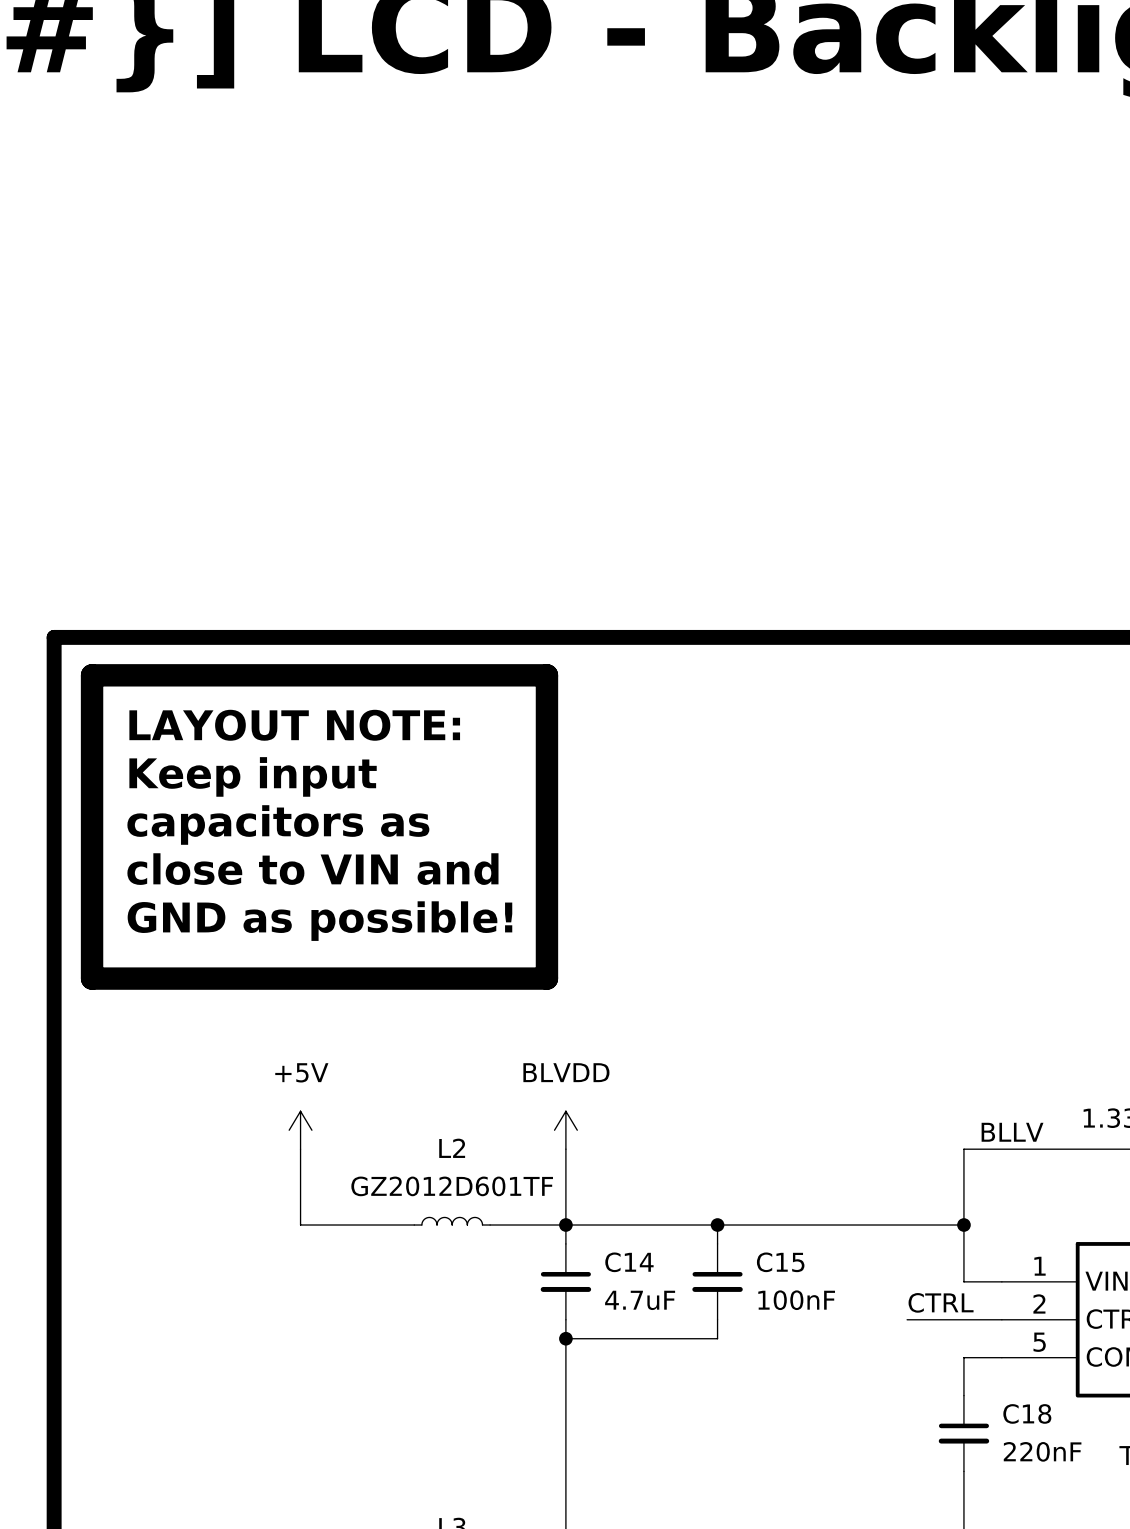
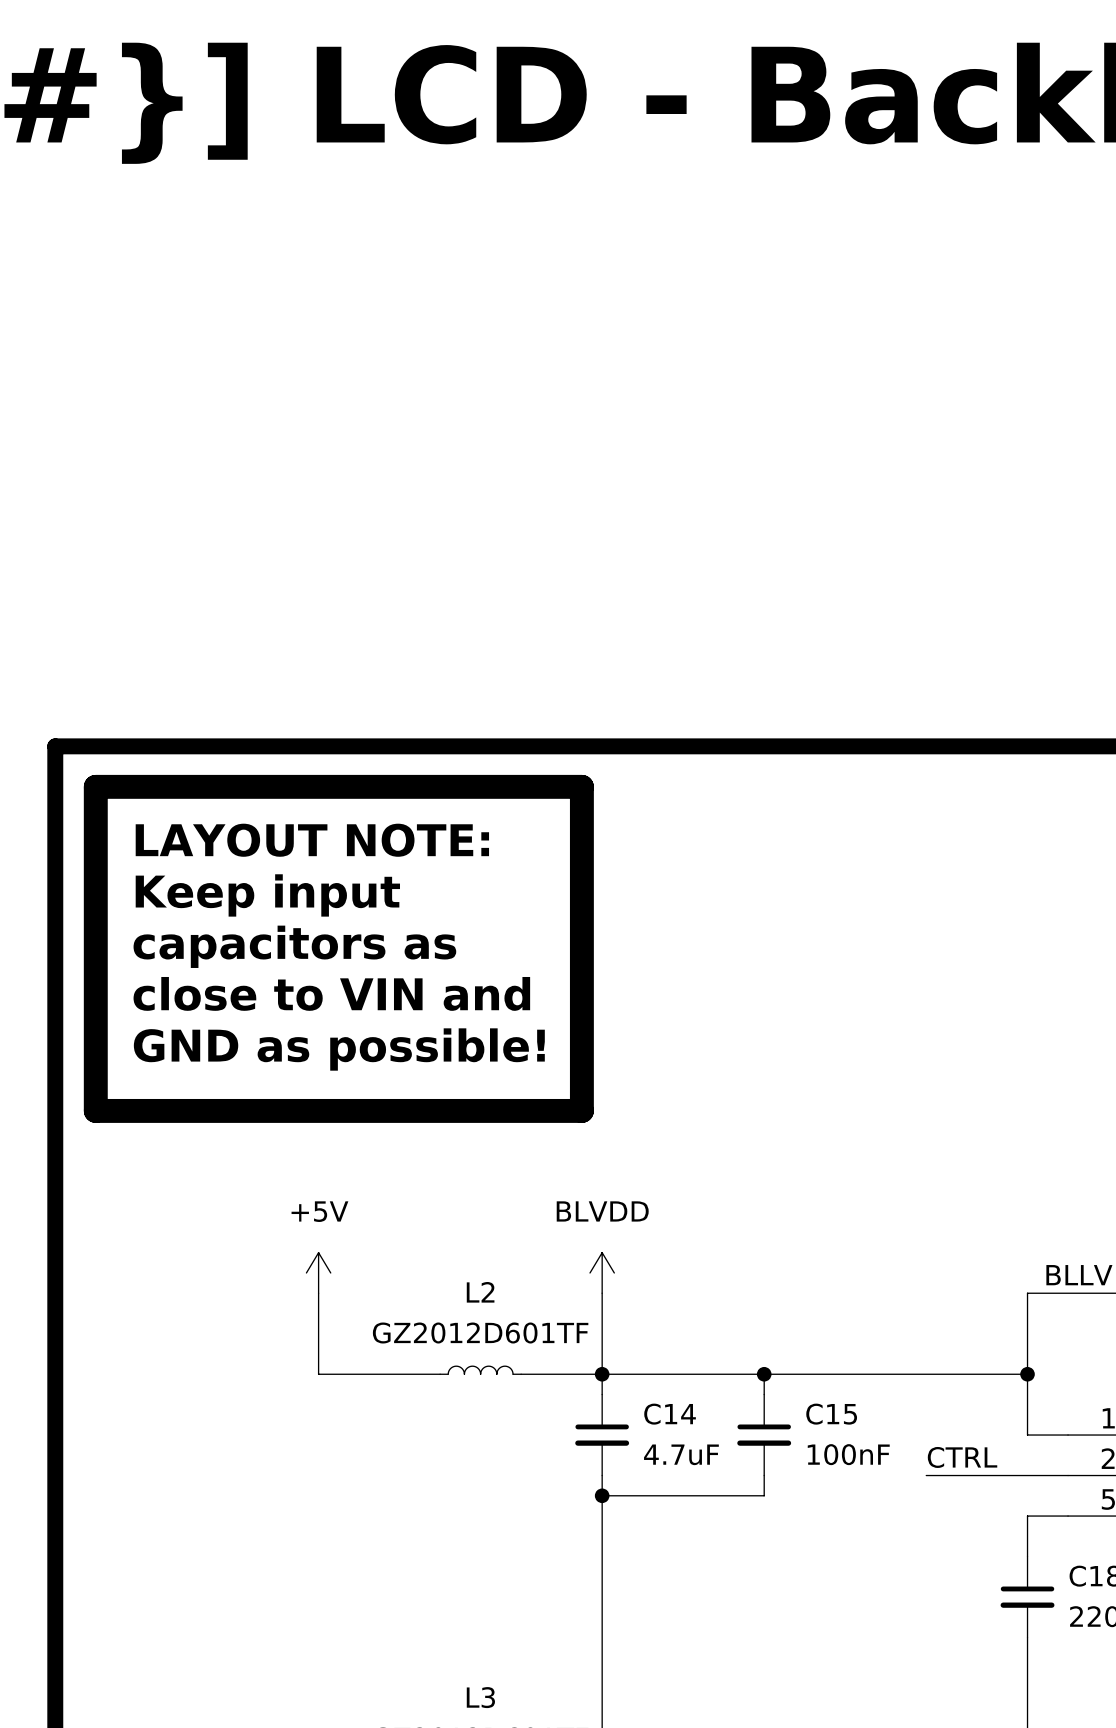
label position: CTRL (941, 1302) -> CTRL (962, 1457)
wire: none -> (926, 1475) (966, 1475)

